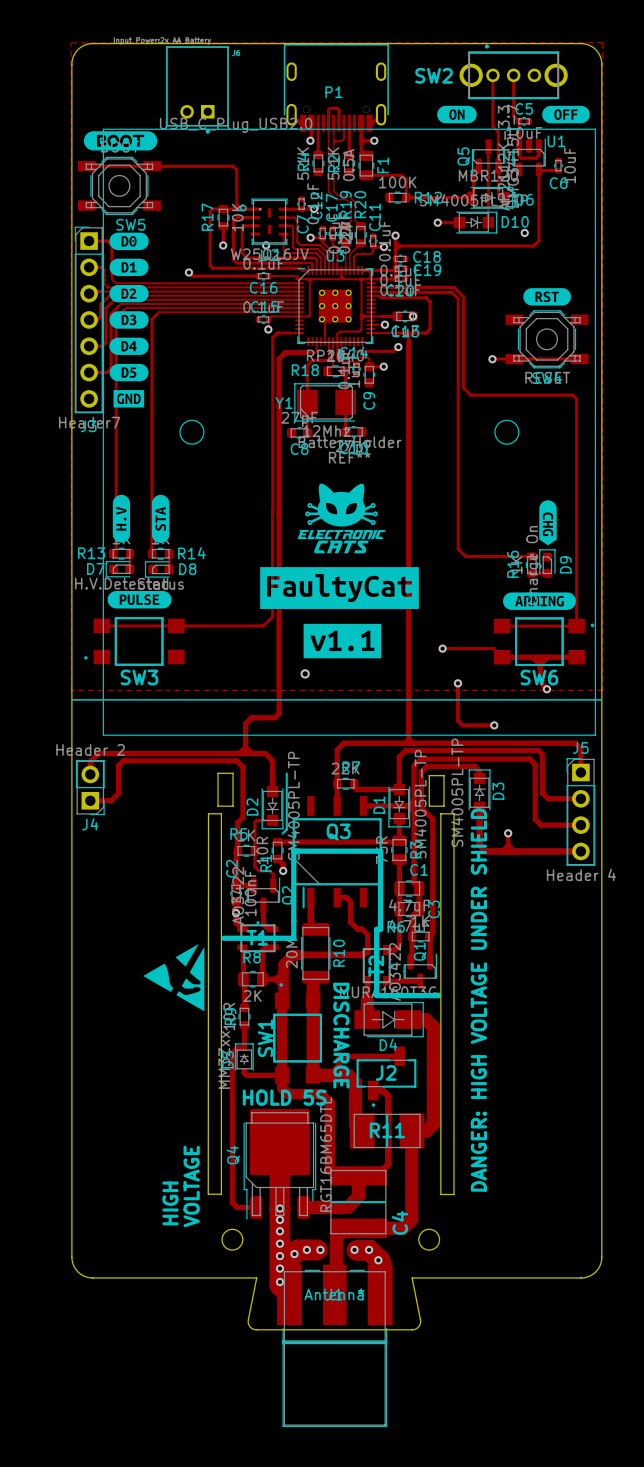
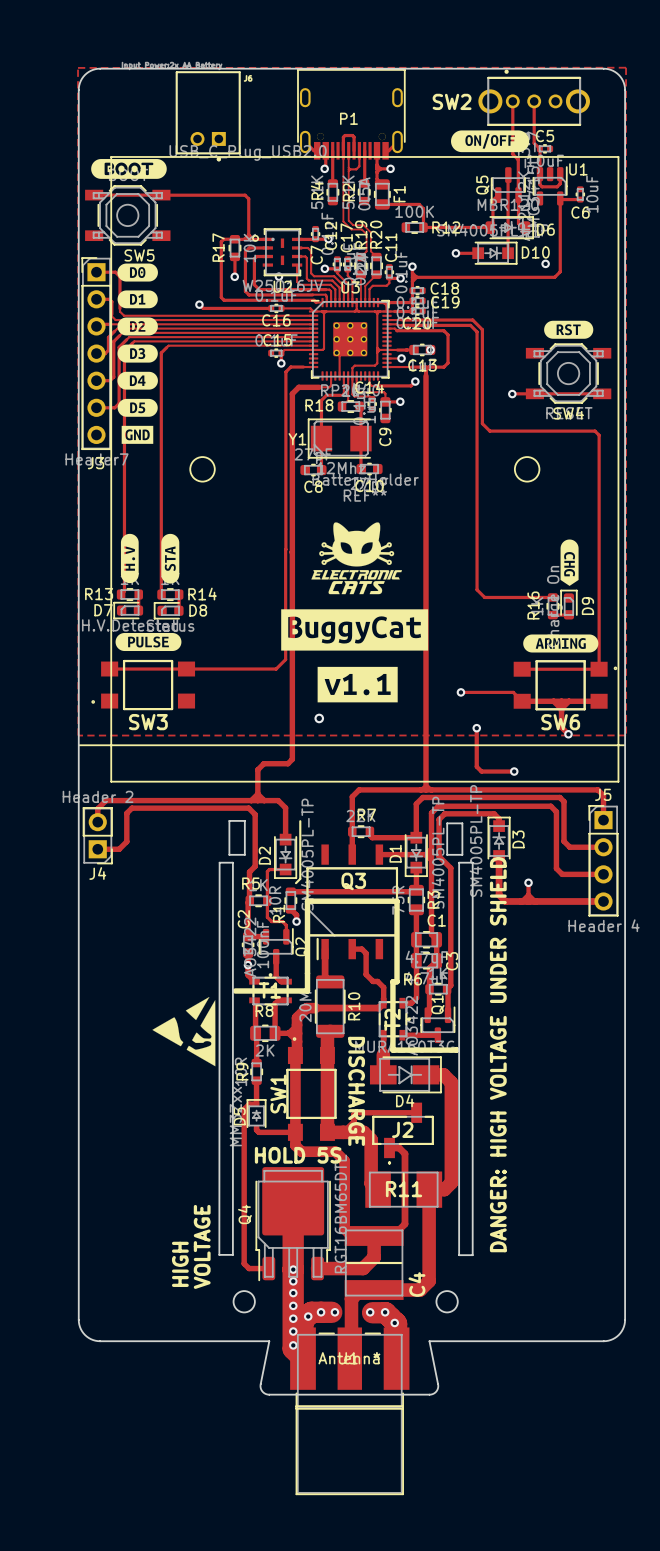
drawing: none -> [451, 130, 530, 153]
drawing: [437, 105, 477, 124] -> none
drawing: [542, 105, 590, 124] -> none
drawing shape: [260, 567, 419, 609] -> [281, 609, 429, 651]

